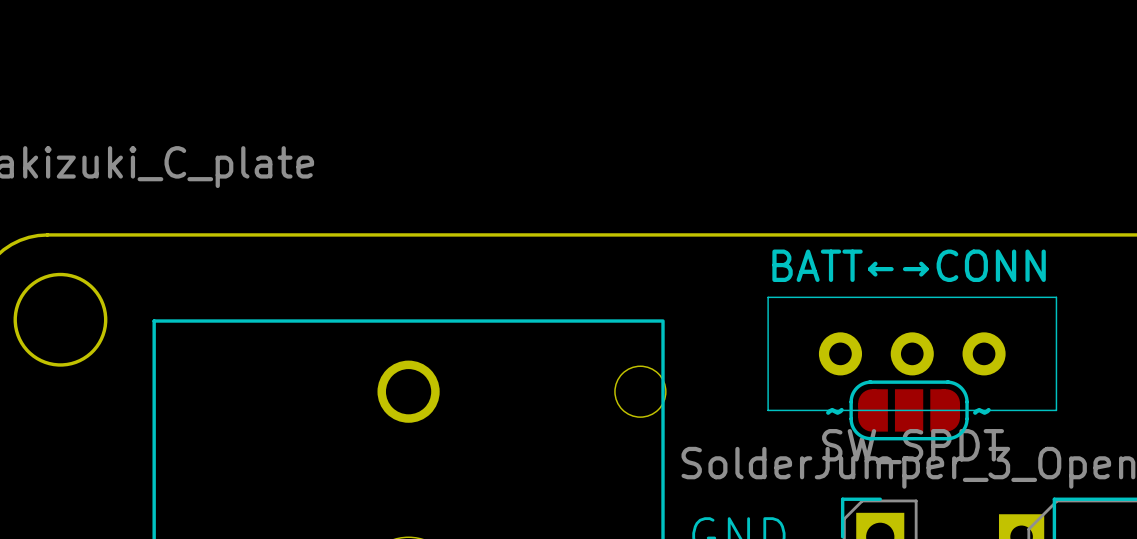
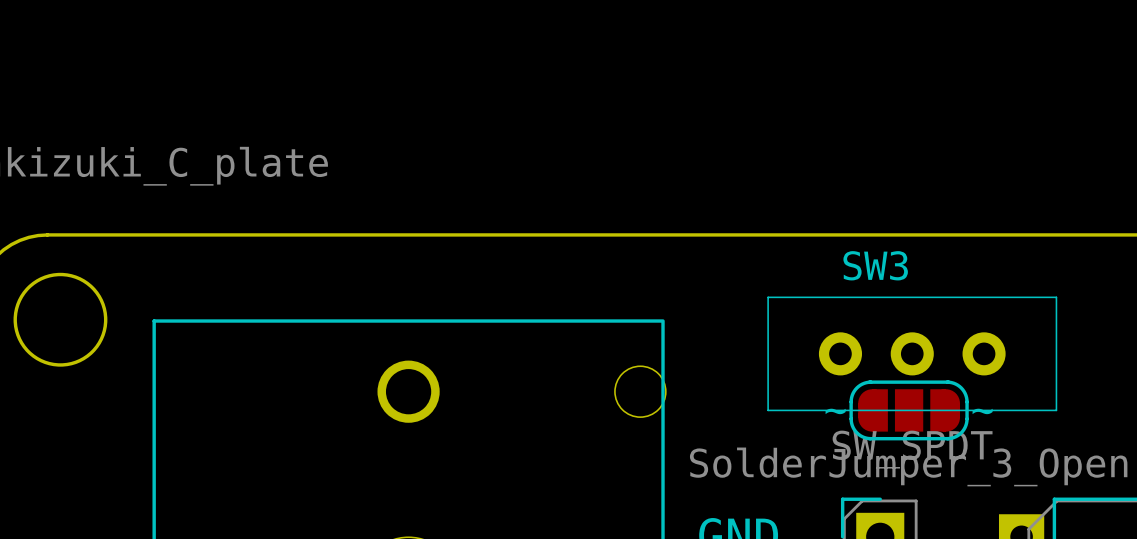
BATT←→CONN name: BATT←→CONN (909, 265) -> SW3 (875, 265)

